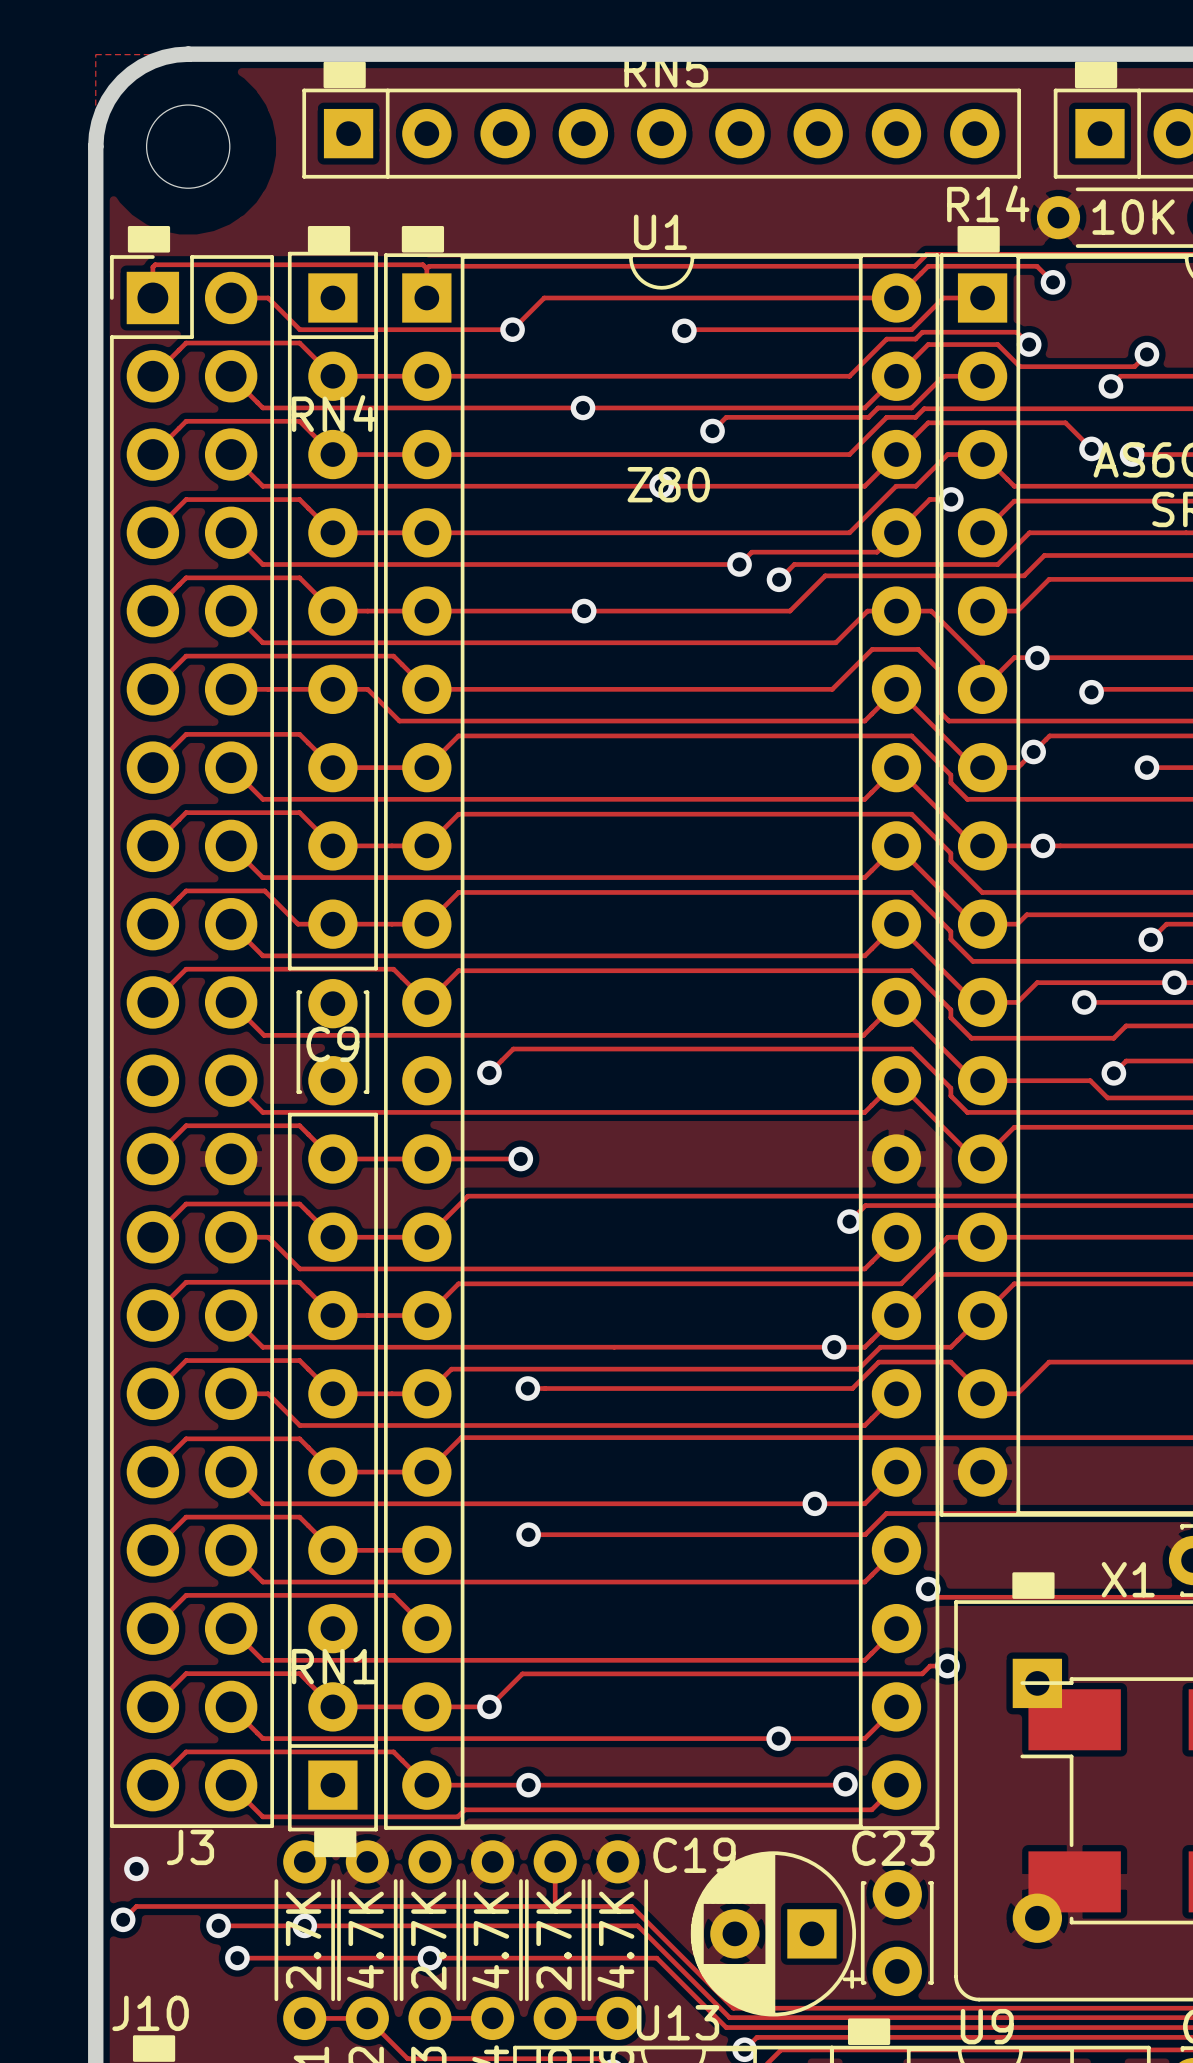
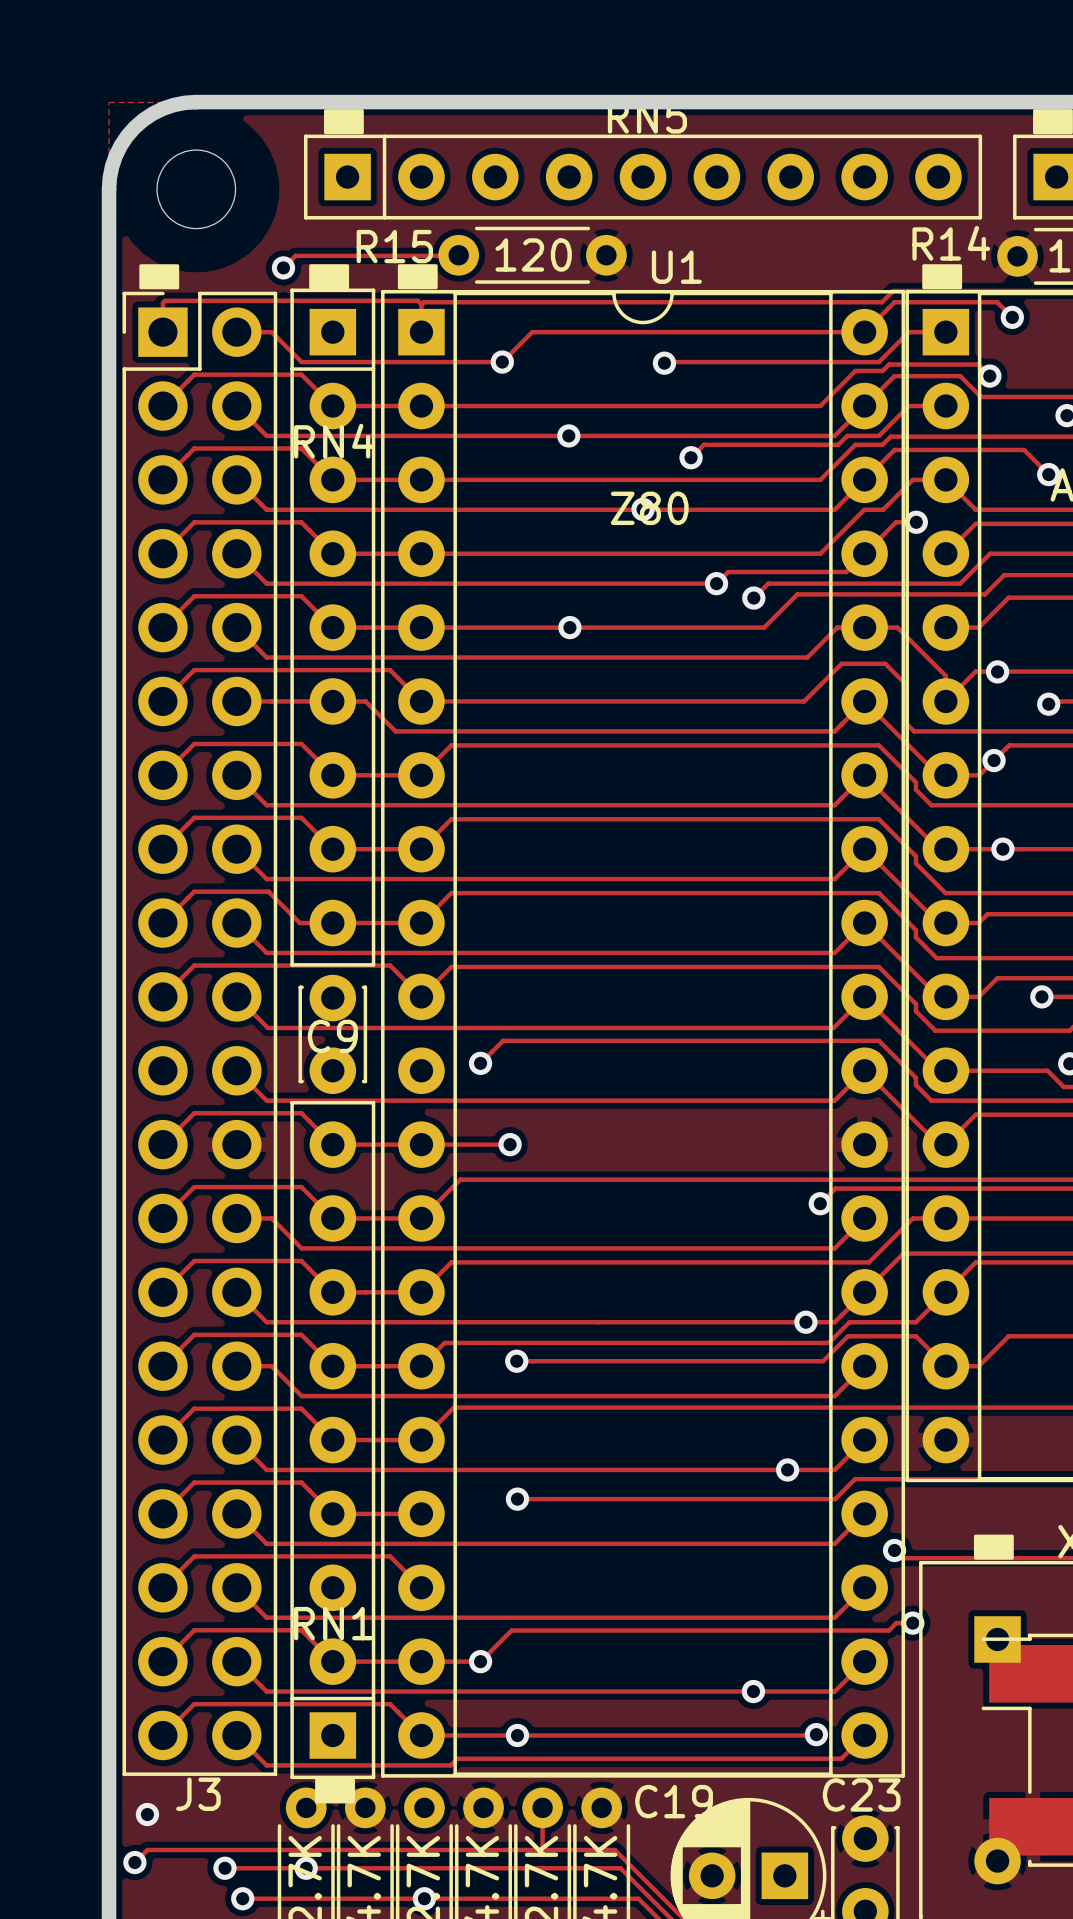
track: none -> (458, 255) (295, 255) (283, 267)
R15: none -> (532, 255)
text: none -> 120 (533, 254)
via: none -> (283, 267)
U1 name position: U1 (660, 232) -> U1 (676, 267)

